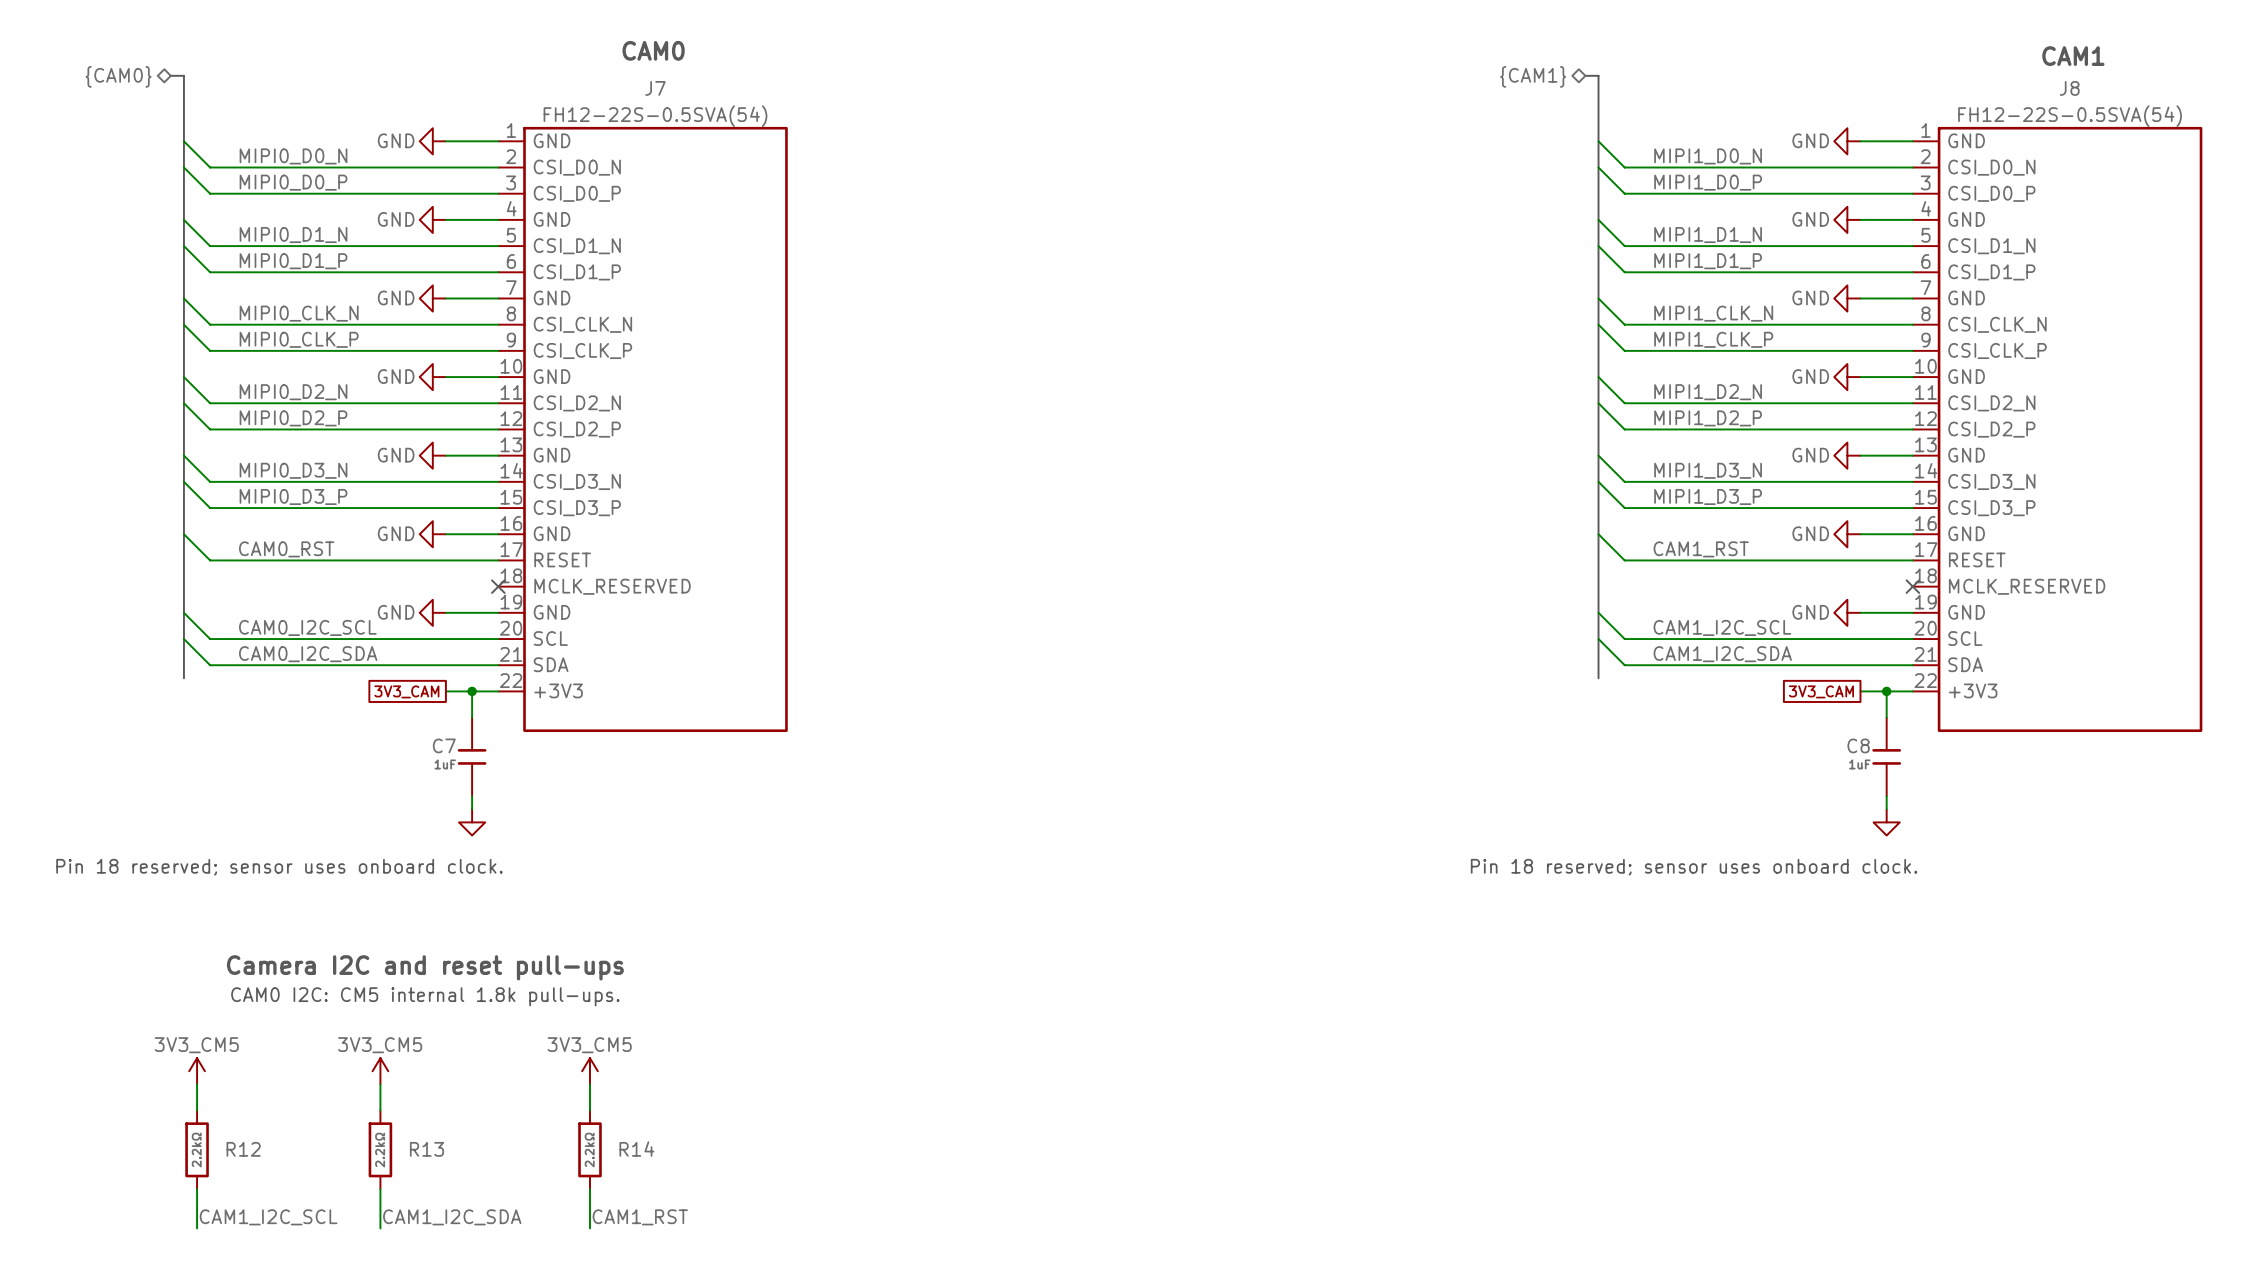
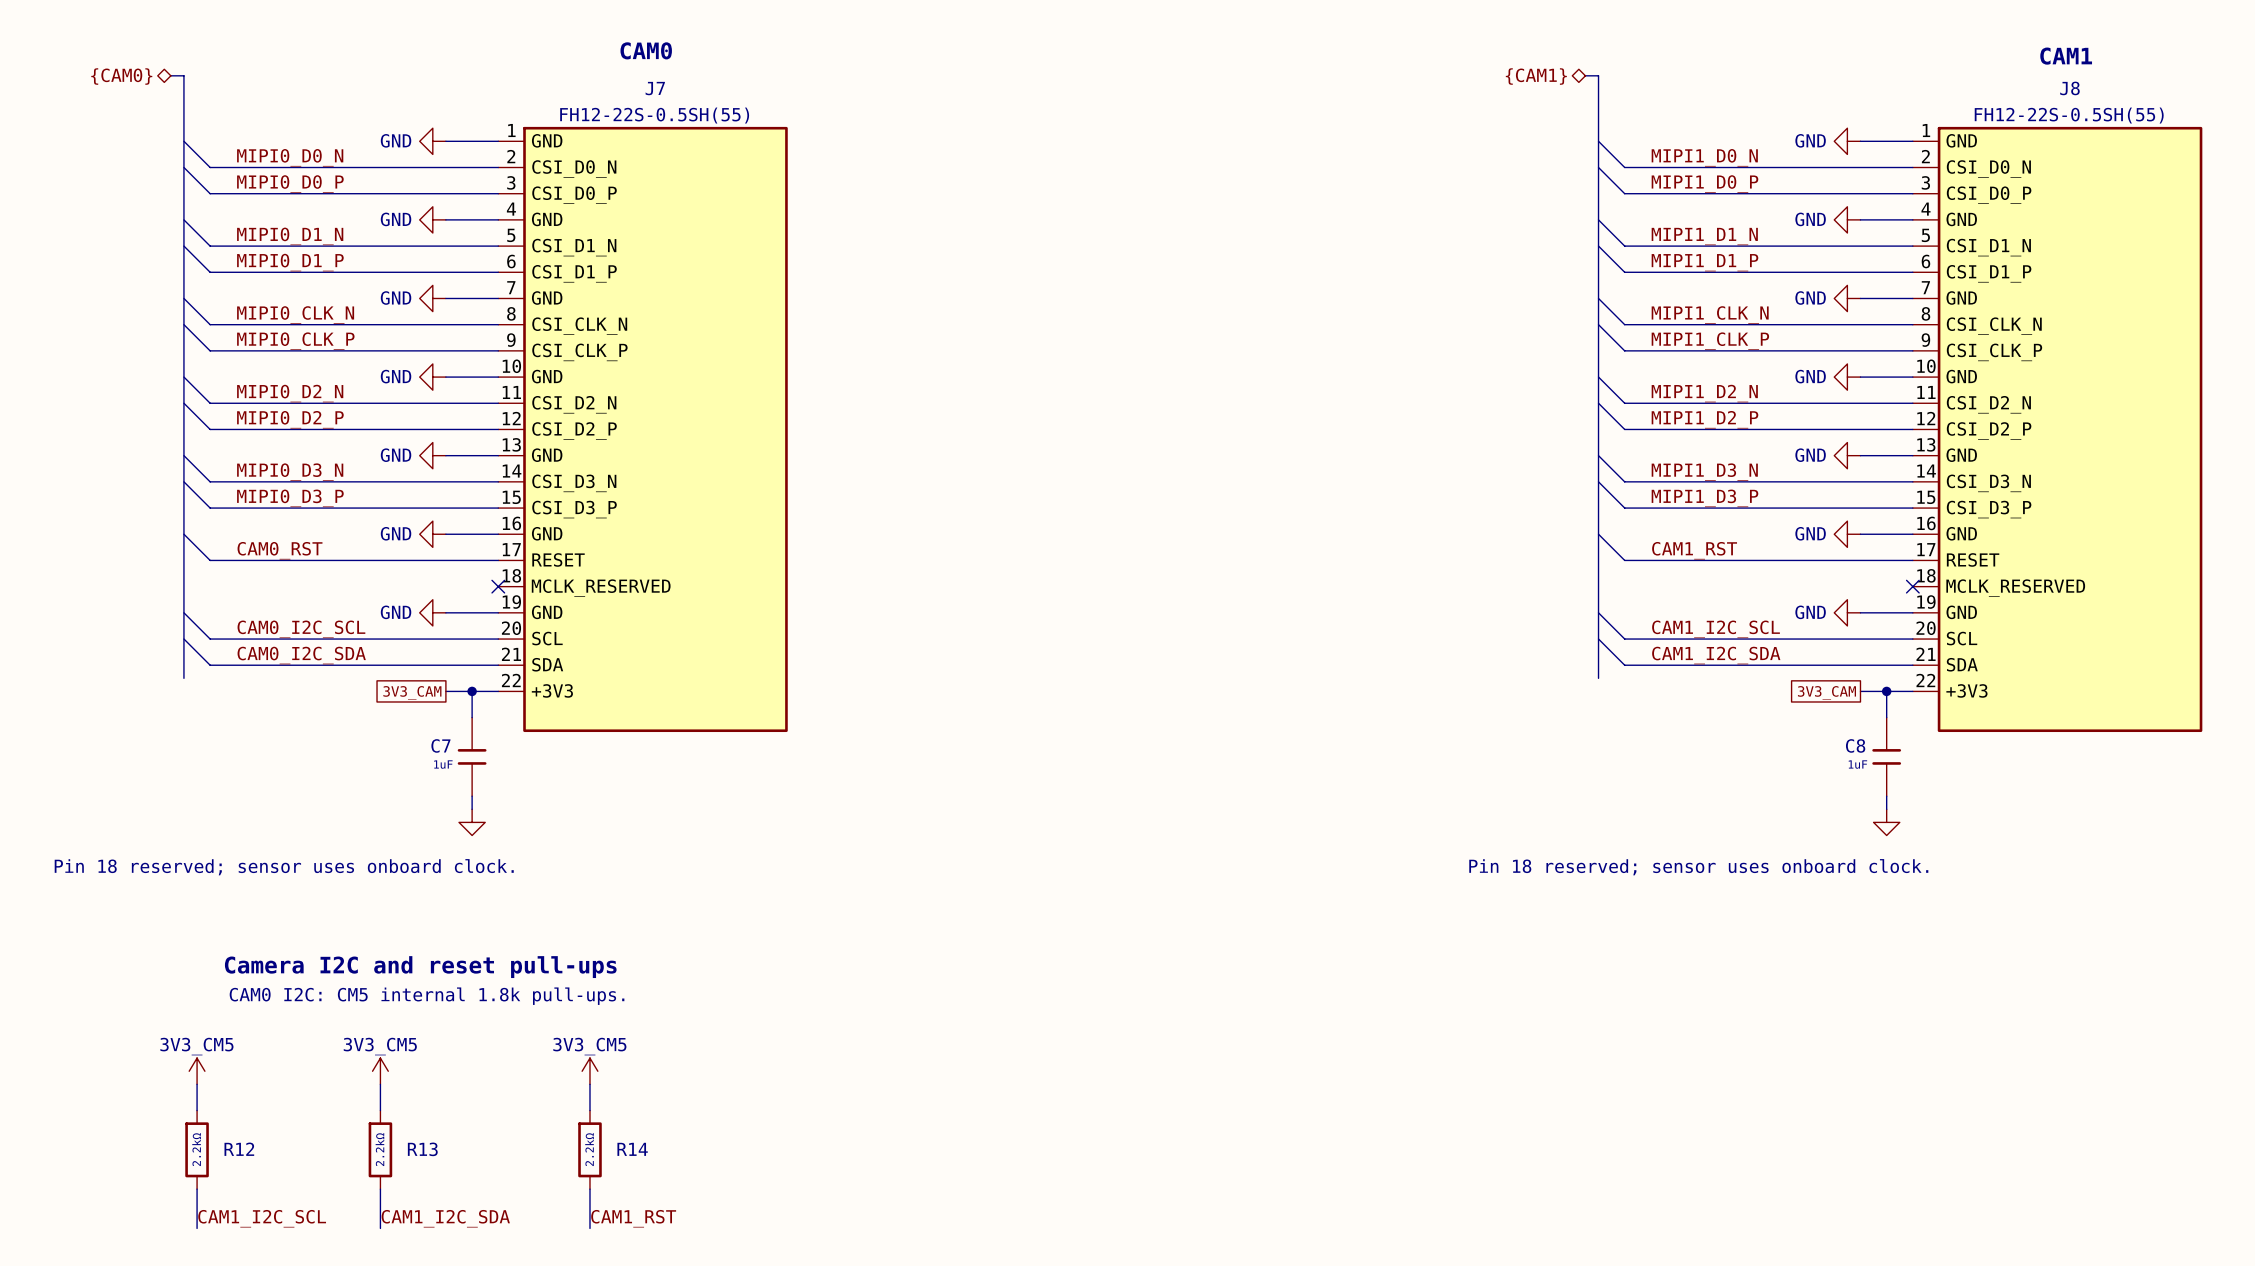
J7 value: FH12-22S-0.5SVA(54) (655, 116) -> FH12-22S-0.5SH(55) (654, 115)
J8 value: FH12-22S-0.5SVA(54) (2070, 116) -> FH12-22S-0.5SH(55) (2069, 115)

